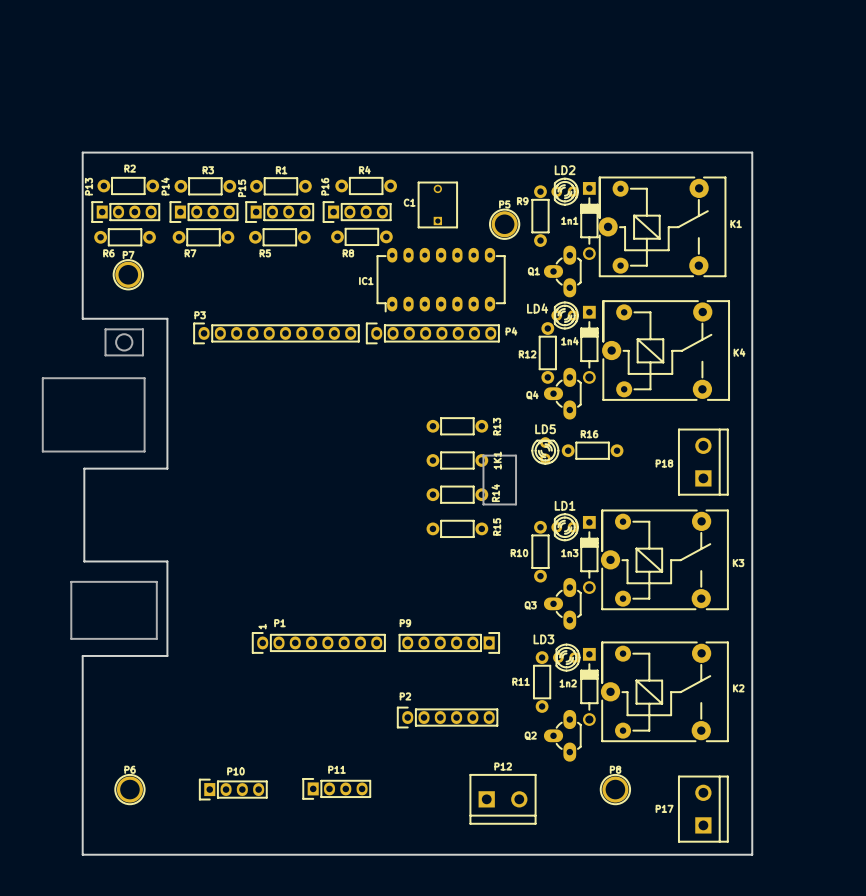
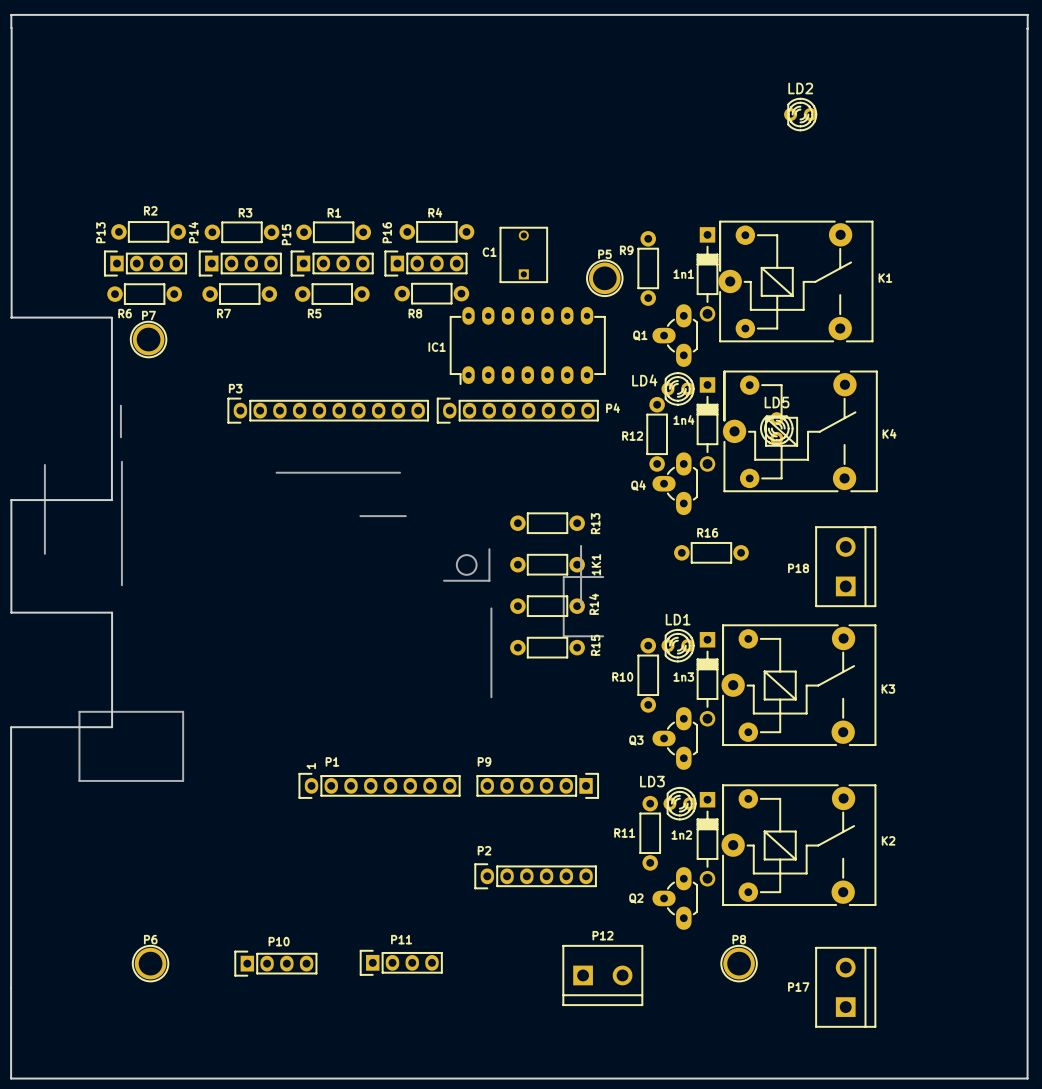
board edge: none -> (11, 27) (11, 317)
board edge: none -> (11, 28) (11, 14) (1027, 14) (1027, 28)
board edge: none -> (1027, 28) (1027, 1078) (11, 1078) (11, 727)
board edge: (82, 152) (82, 318) (167, 318) (167, 468) (84, 468) (84, 561) (167, 561) (167, 655) (82, 655) (82, 854) (752, 854) (752, 152) (82, 152) -> none
LD2 position: (565, 191) -> (800, 114)
board edge: none -> (11, 317) (111, 317)
board edge: none -> (111, 317) (111, 499)
line: (105, 329) (142, 329) (142, 355) (105, 355) -> none
drawing: [115, 333, 133, 352] -> none
line: none -> (121, 461) (121, 585)
line: (42, 378) (144, 378) (144, 451) (42, 451) -> none
line: none -> (276, 472) (400, 472)
board edge: none -> (112, 500) (11, 500) (11, 612) (112, 612) (112, 727) (11, 727)
line: none -> (360, 516) (405, 516)
line: none -> (581, 545) (581, 605)
line: none -> (489, 549) (489, 580) (444, 580)
LD5 position: (545, 450) -> (776, 428)
drawing: none -> [456, 554, 478, 576]
line: (483, 455) (483, 504) (516, 504) (516, 455) (483, 455) -> none
line: none -> (603, 577) (563, 577) (563, 636) (603, 636)
line: none -> (491, 608) (491, 697)

